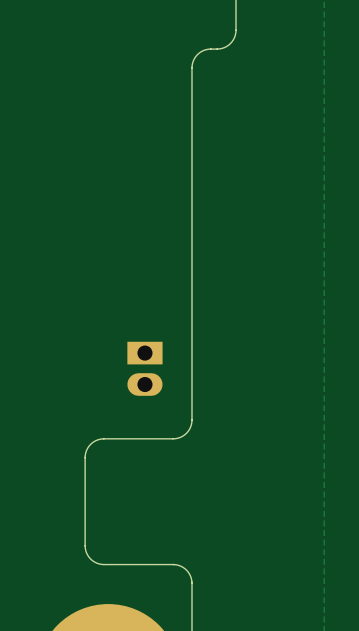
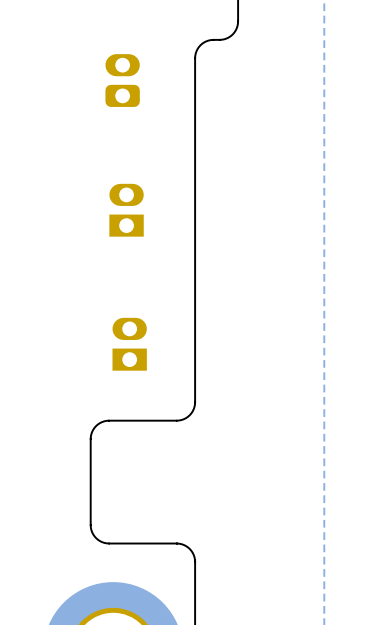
part: none -> (122, 80)
part: none -> (126, 210)
part rotation: 0° (144, 368) -> 180° (129, 344)

